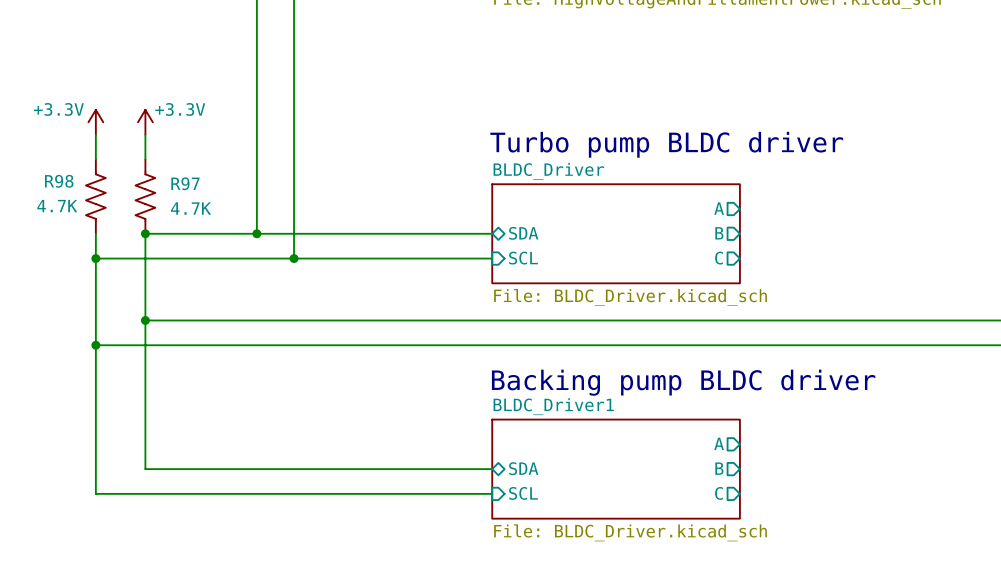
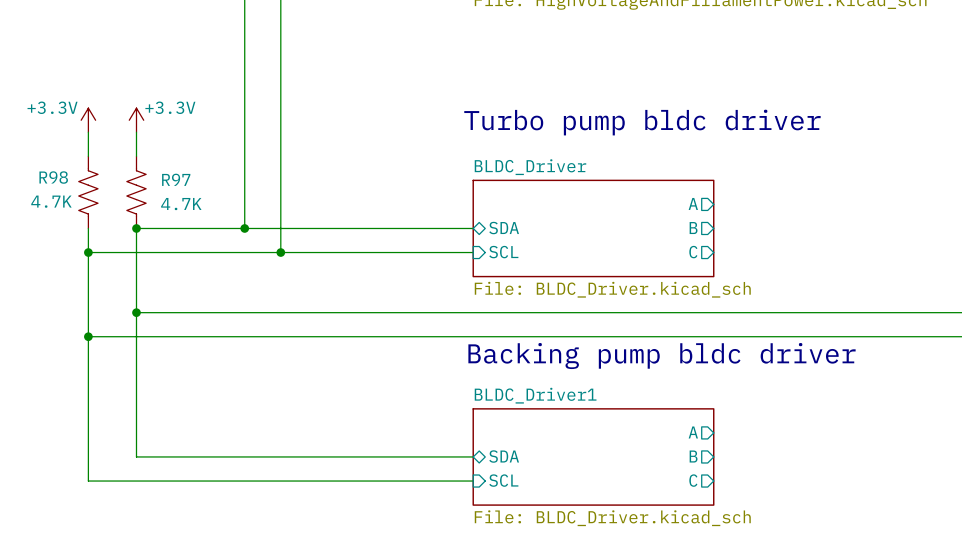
text: Turbo pump BLDC driver (666, 144) -> Turbo pump bldc driver (642, 122)
text: Backing pump BLDC driver (683, 382) -> Backing pump bldc driver (662, 356)

